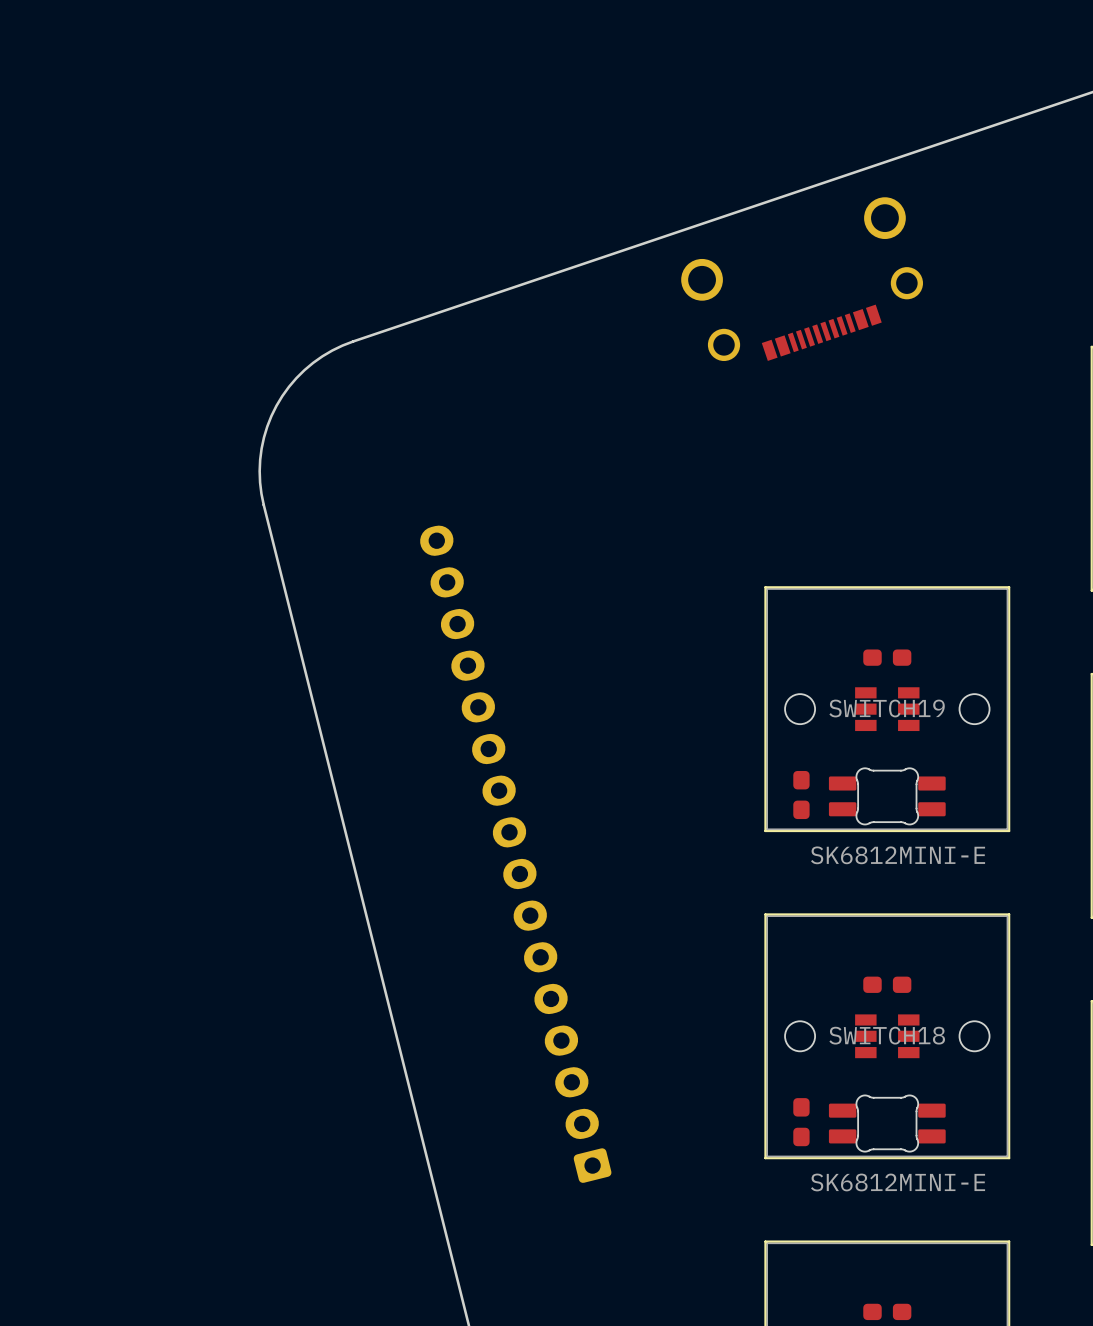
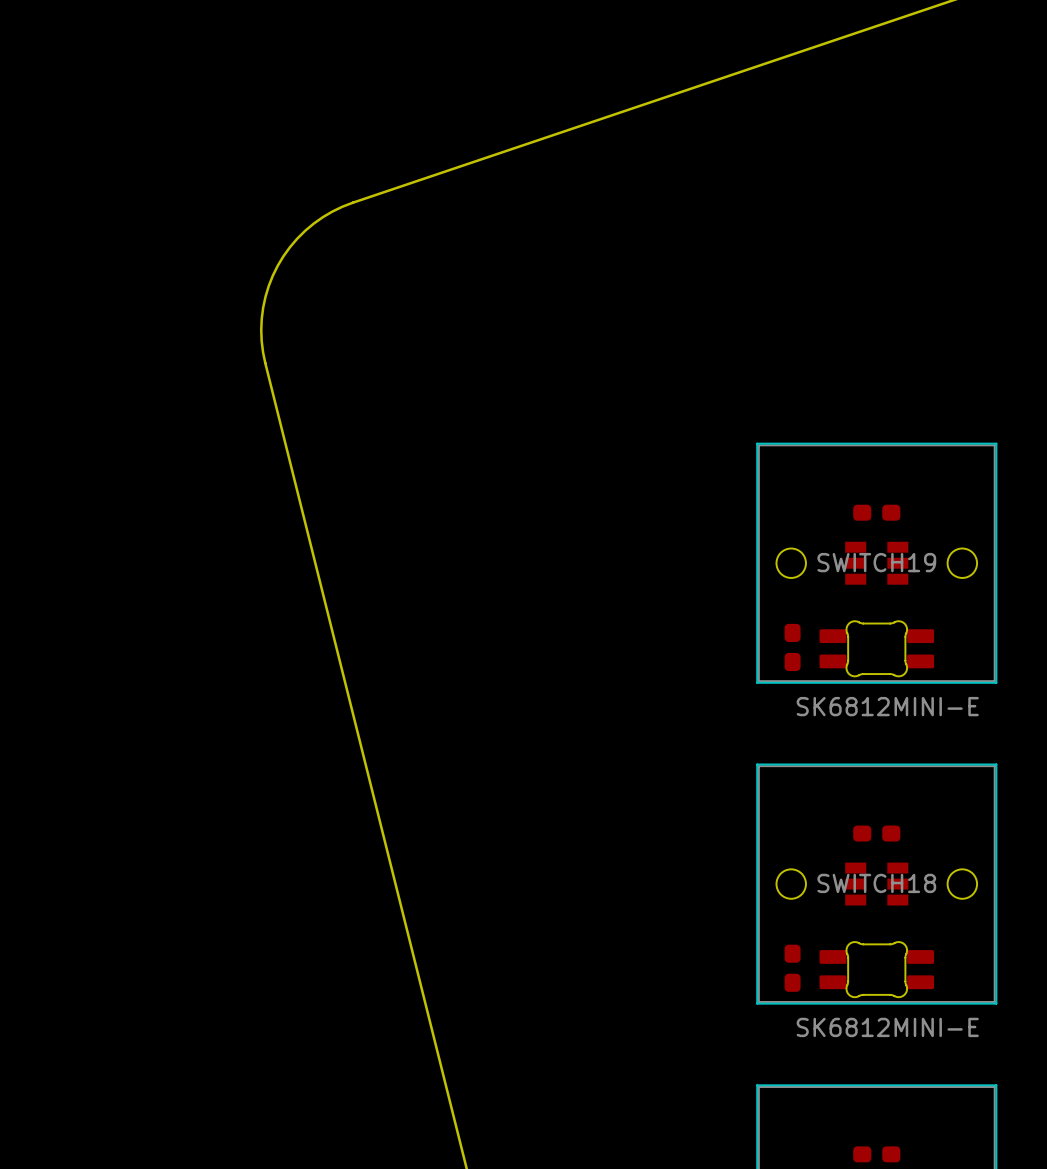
part: (802, 279) -> none
part: (515, 854) -> none

